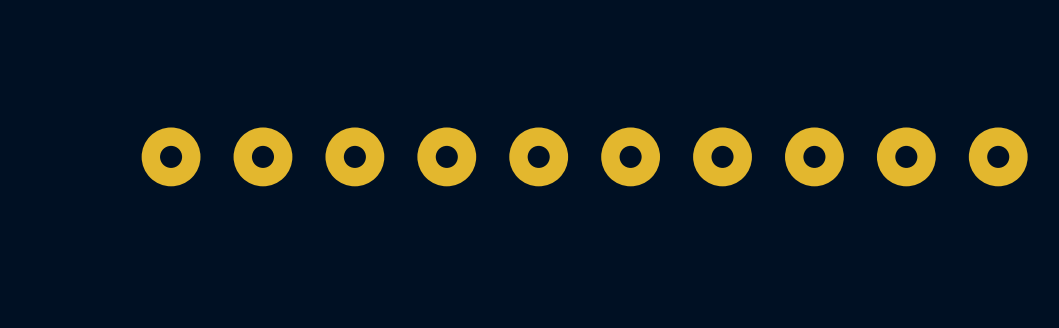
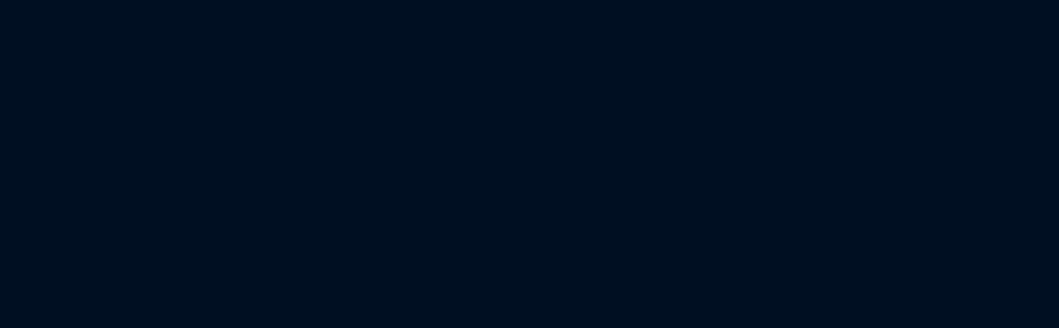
part: (584, 156) -> none

